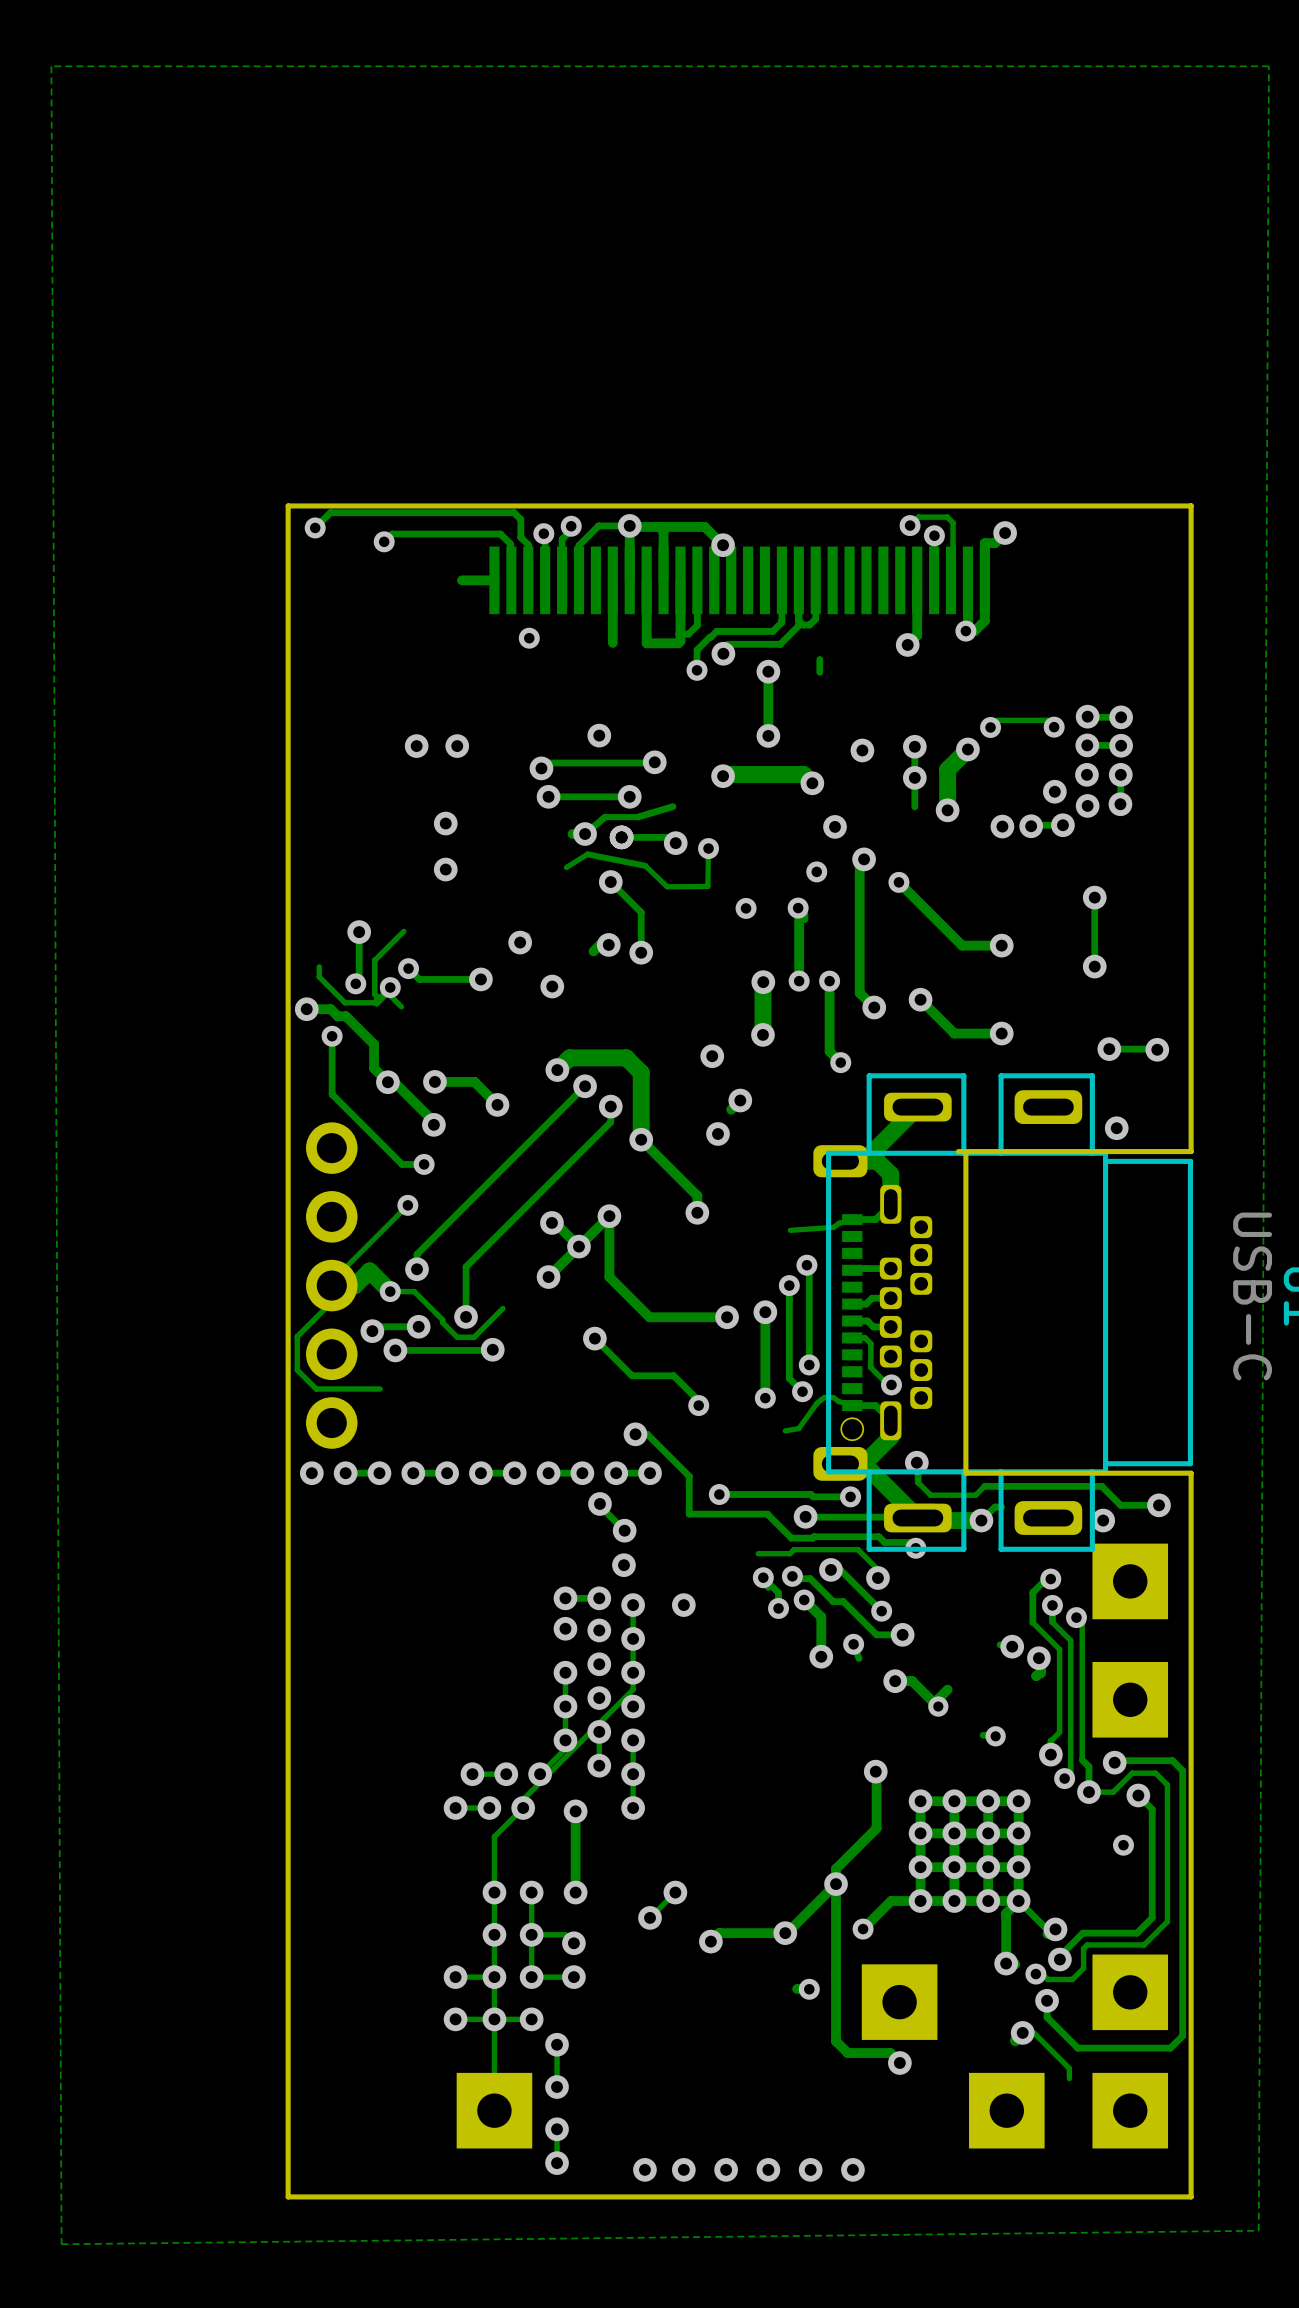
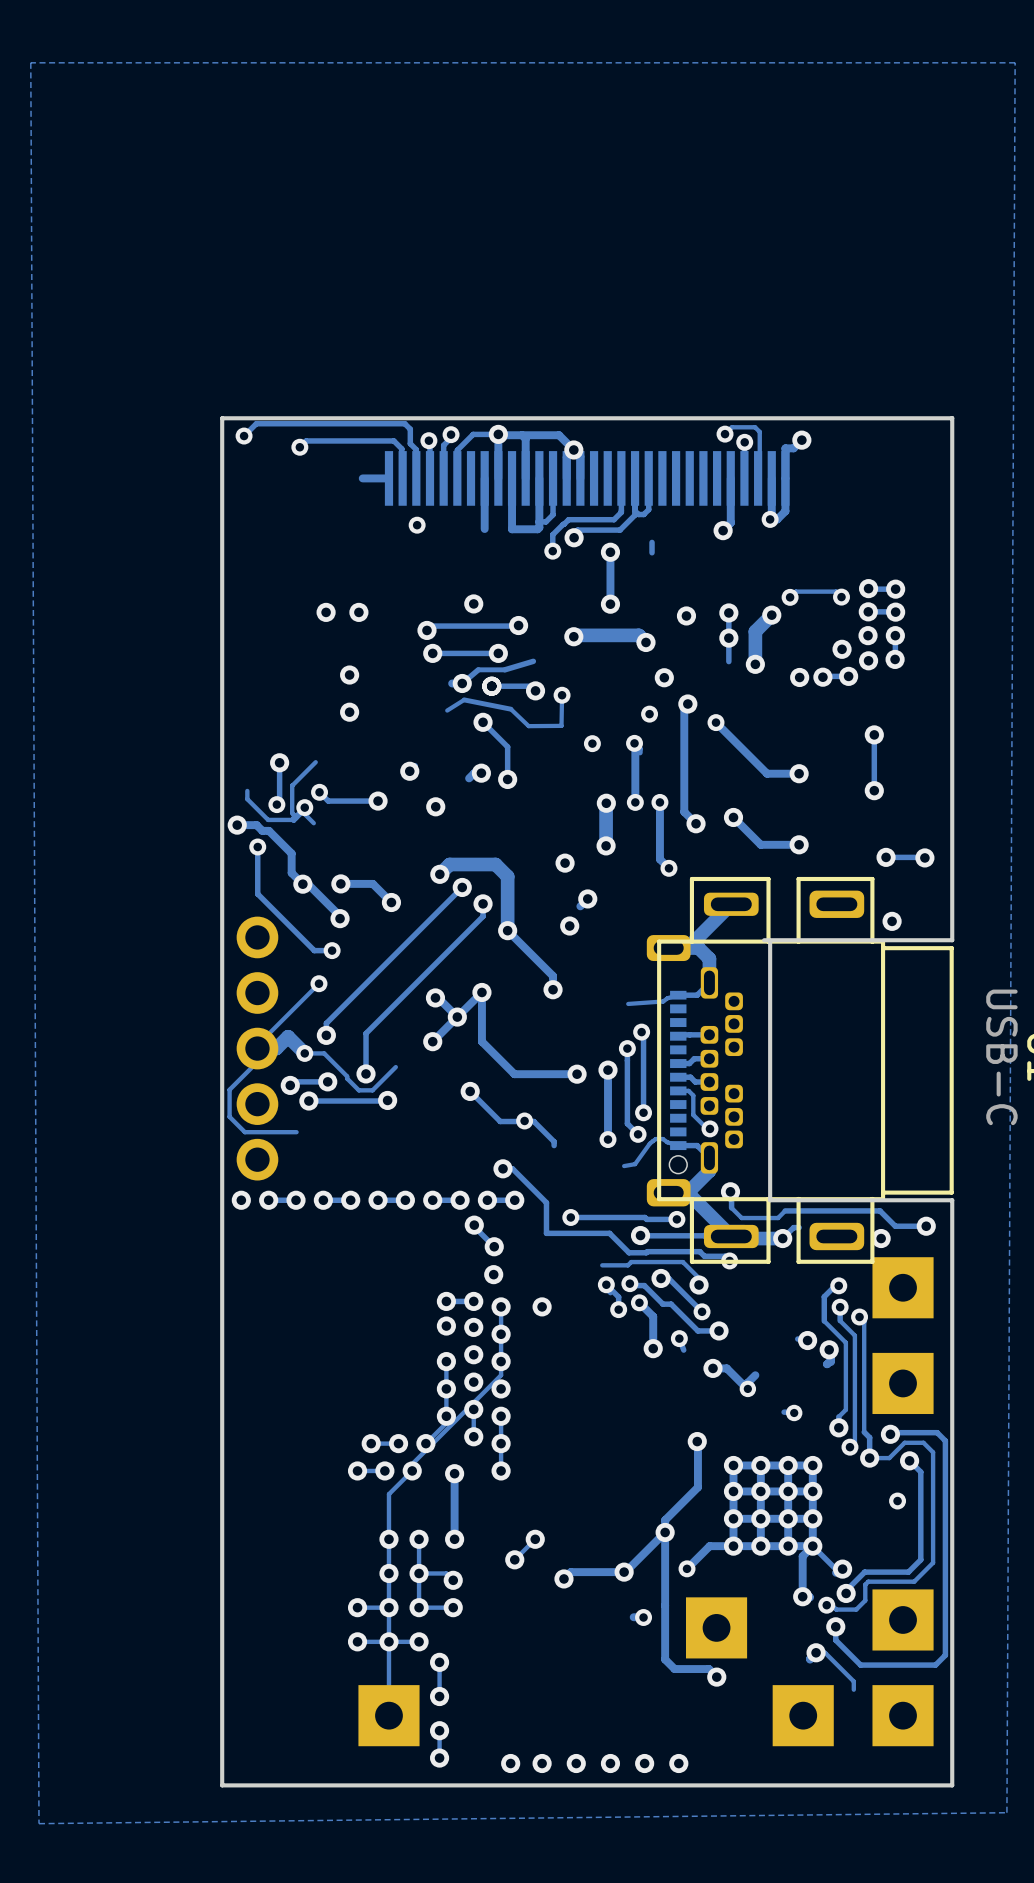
via position: (698, 1405) -> (524, 1120)

